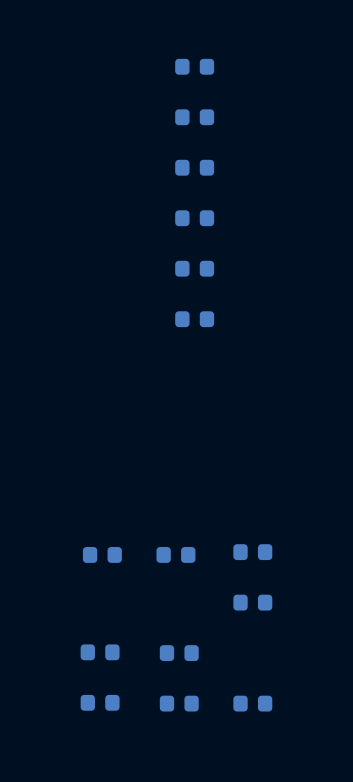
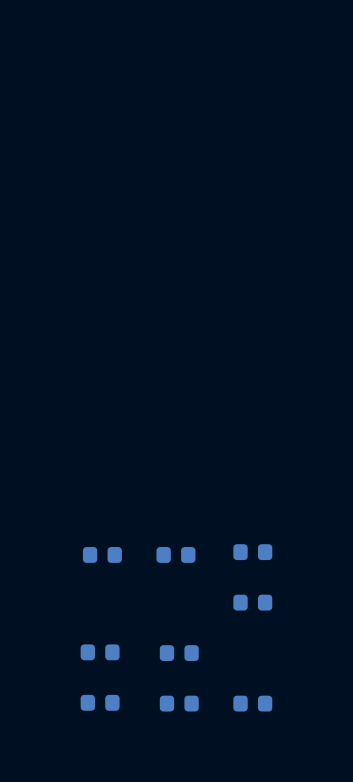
part: (194, 66) -> none
part: (194, 117) -> none
part: (194, 167) -> none
part: (194, 218) -> none
part: (194, 268) -> none
part: (194, 319) -> none

